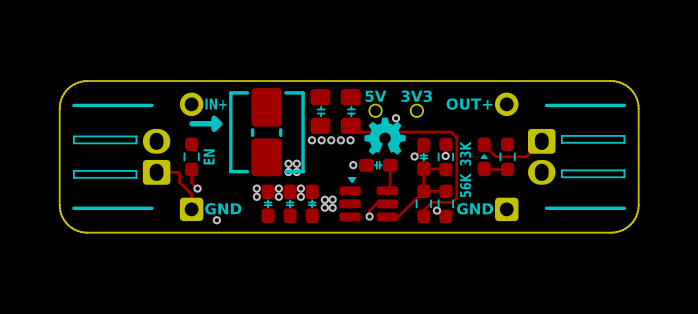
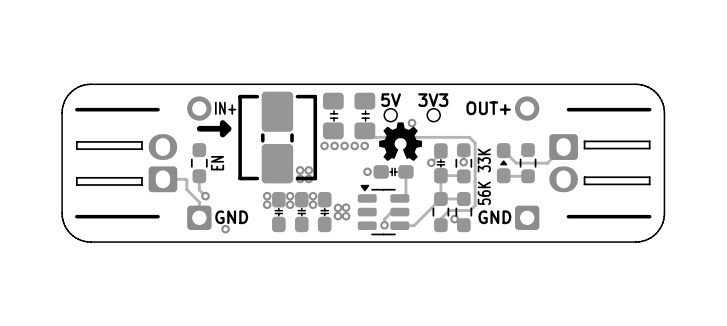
part footprint: [339, 176, 399, 222] -> [357, 184, 410, 236]

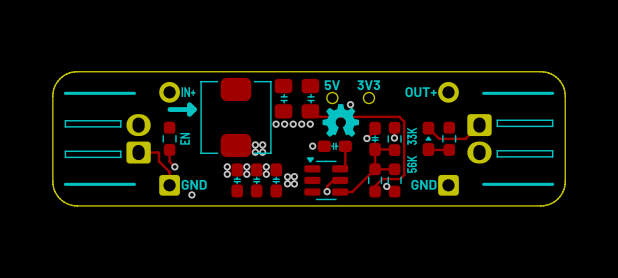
part footprint: [238, 91, 318, 184] -> [200, 77, 272, 158]

